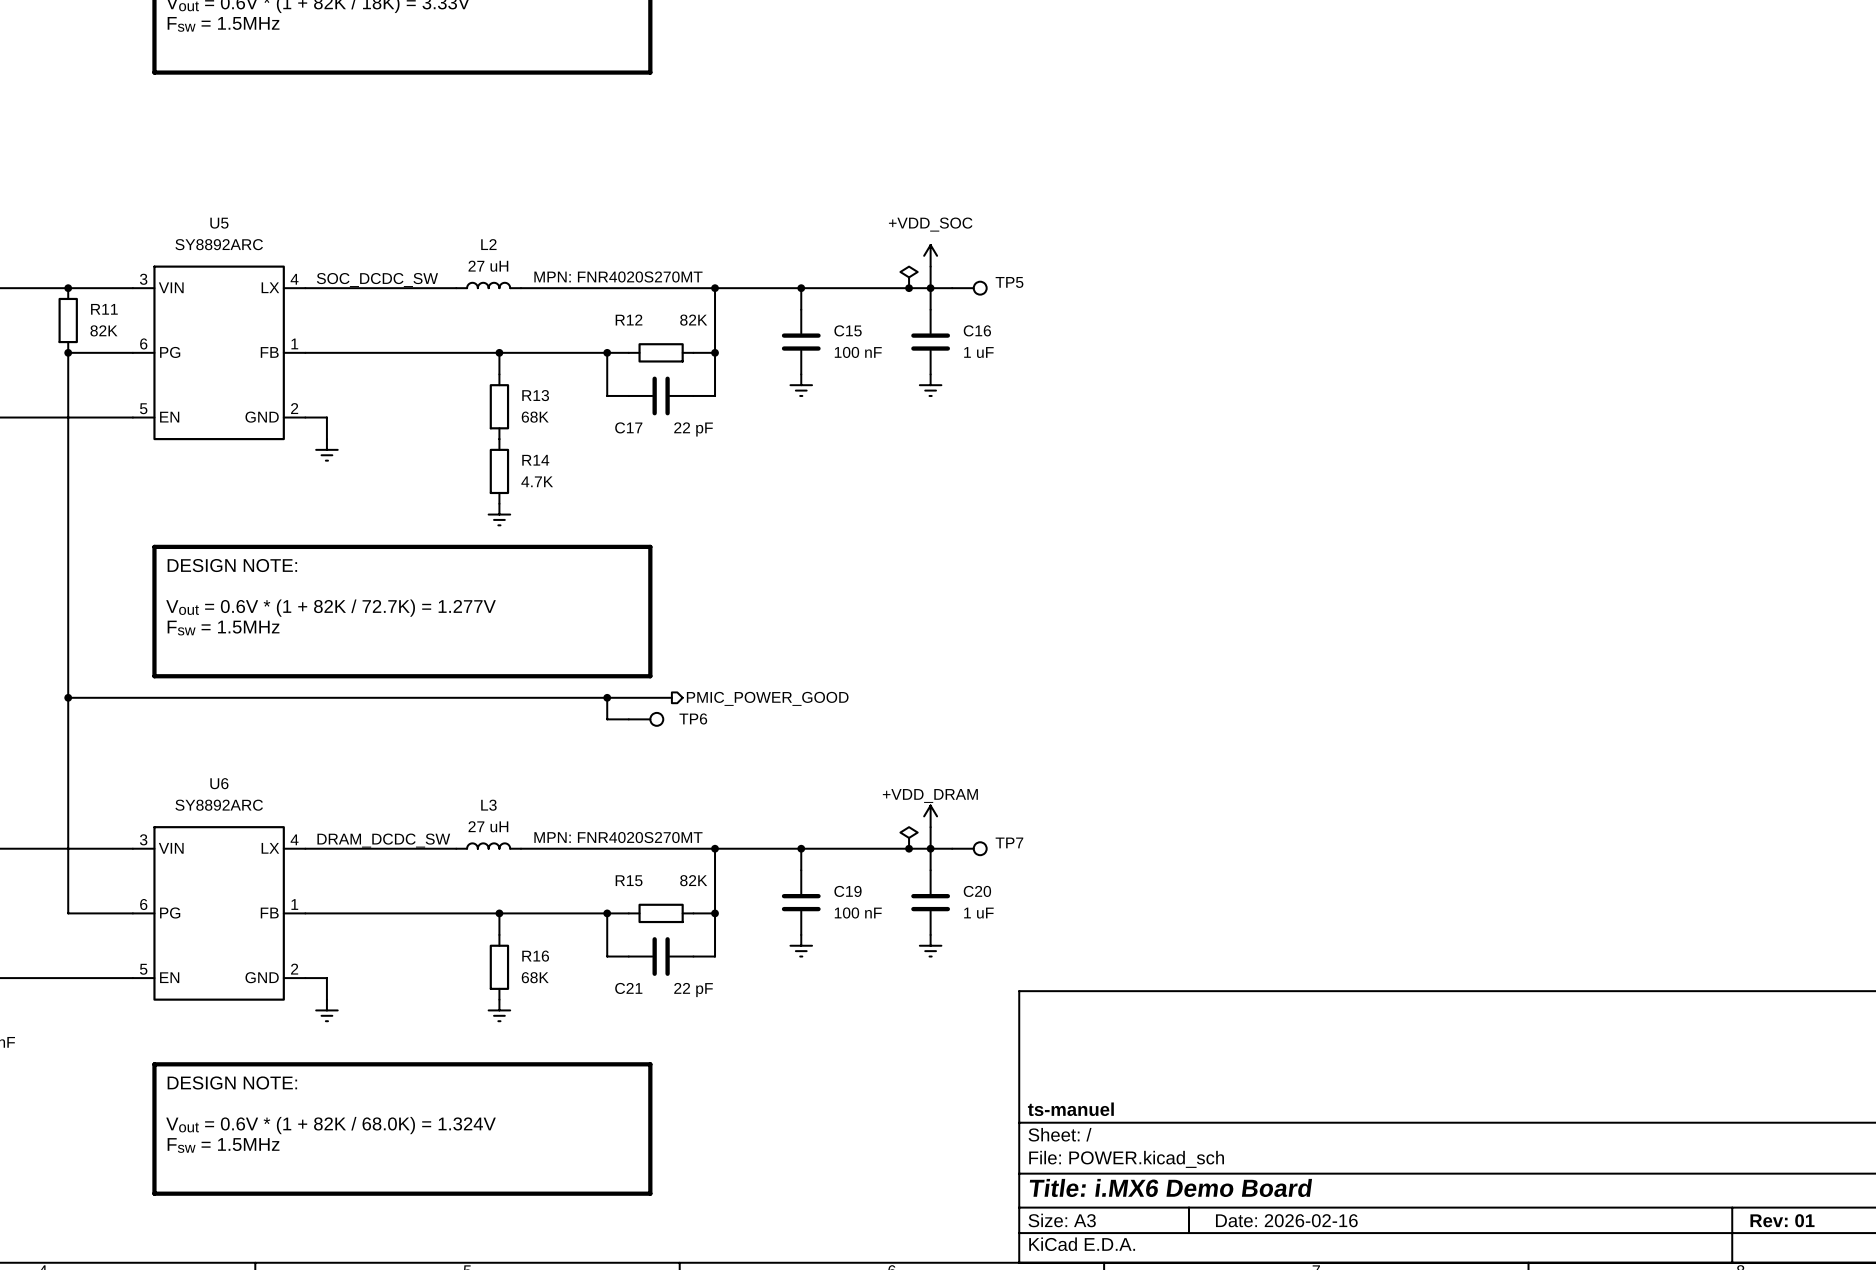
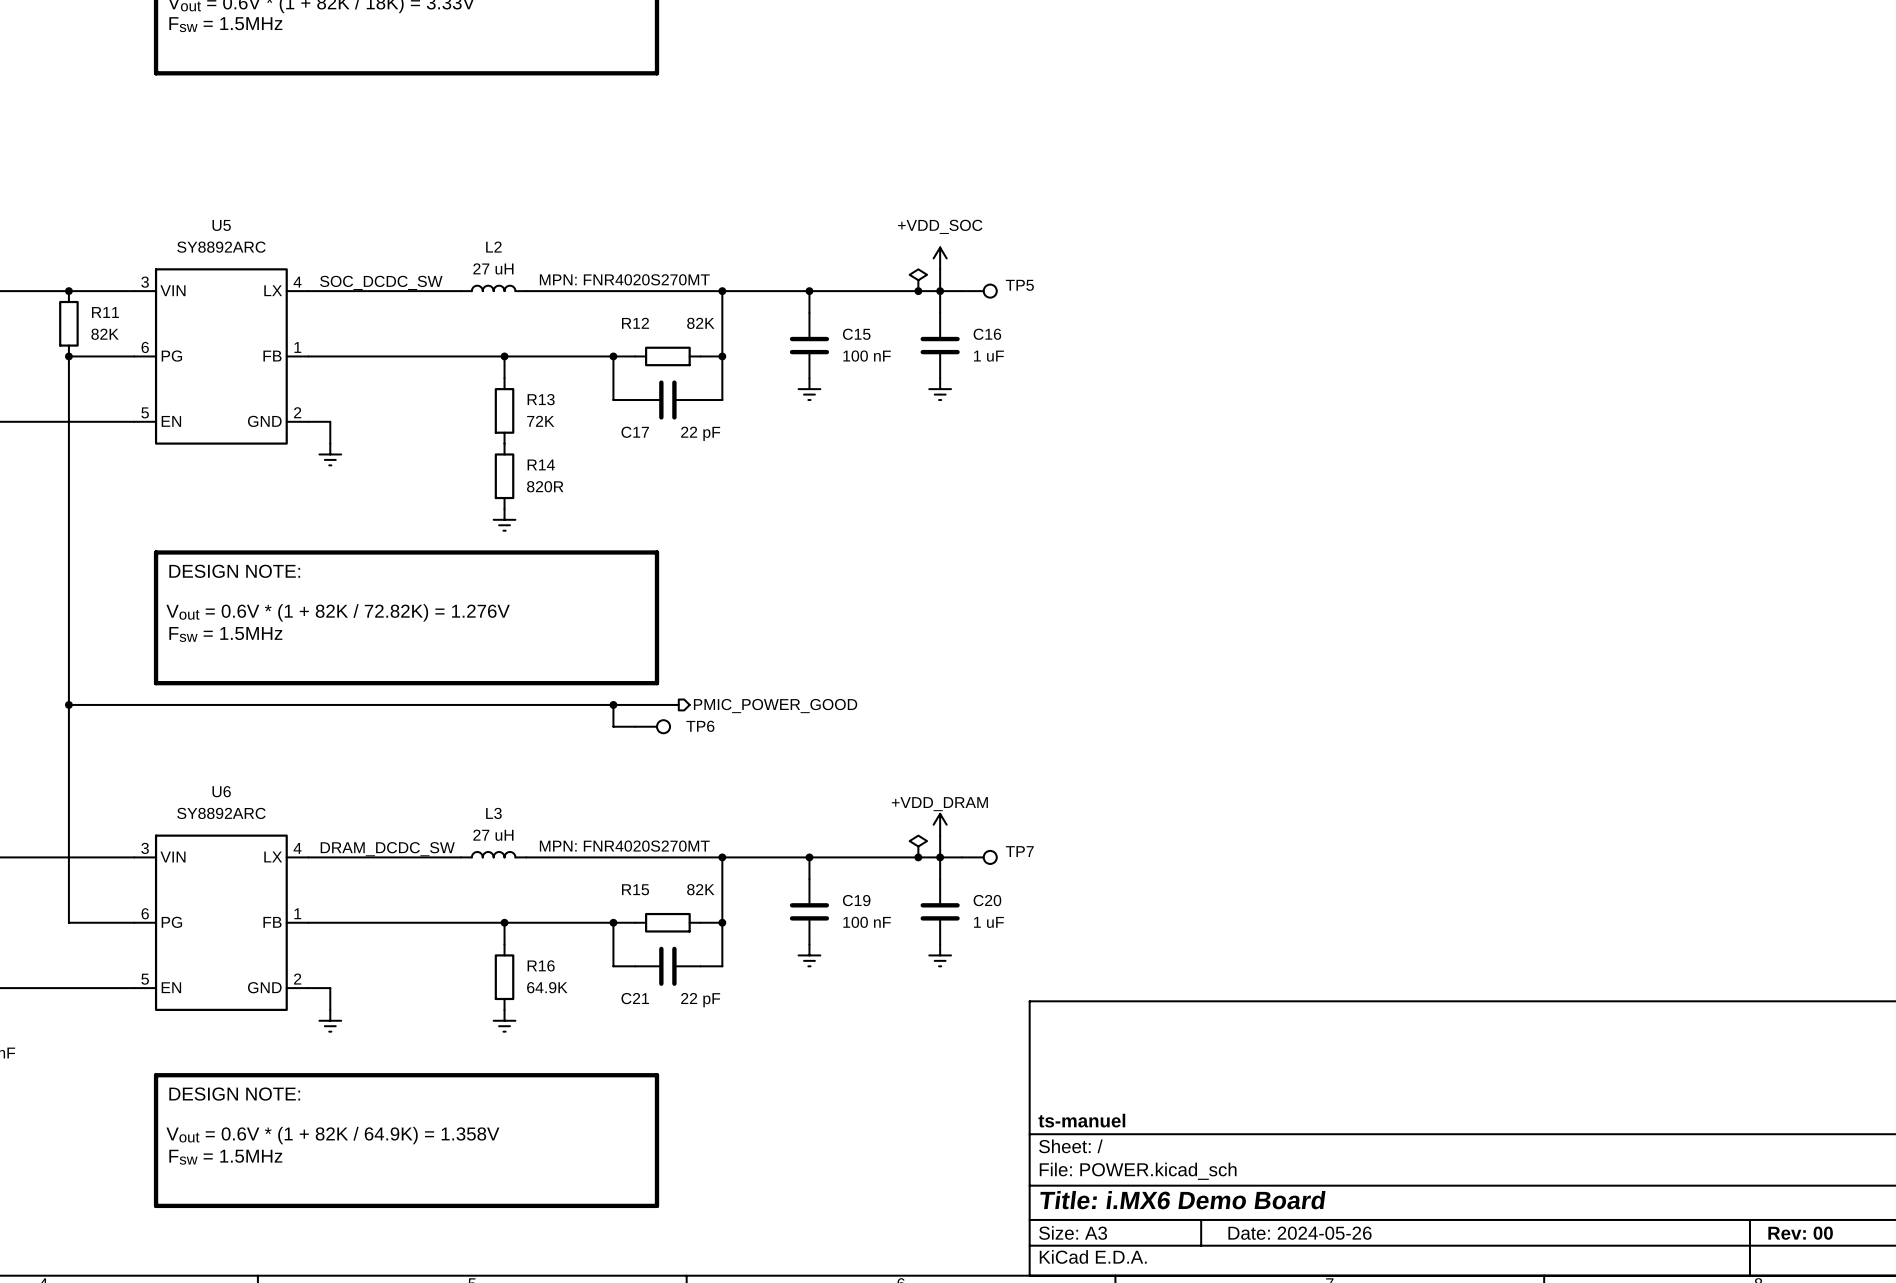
R13 value: 68K (535, 417) -> 72K (540, 421)
R14 value: 4.7K (537, 481) -> 820R (545, 486)
text: Vout = 0.6V * (1 + 82K / 72.7K) = 1.277V (331, 608) -> Vout = 0.6V * (1 + 82K / 72.82K) = 1.276V (338, 612)
R16 value: 68K (535, 977) -> 64.9K (547, 987)
text: Vout = 0.6V * (1 + 82K / 68.0K) = 1.324V (331, 1125) -> Vout = 0.6V * (1 + 82K / 64.9K) = 1.358V (332, 1135)
title block: Date: 2026-02-16 (1286, 1220) -> Date: 2024-05-26 (1300, 1233)
title block: Rev: 01 (1782, 1220) -> Rev: 00 (1800, 1233)

